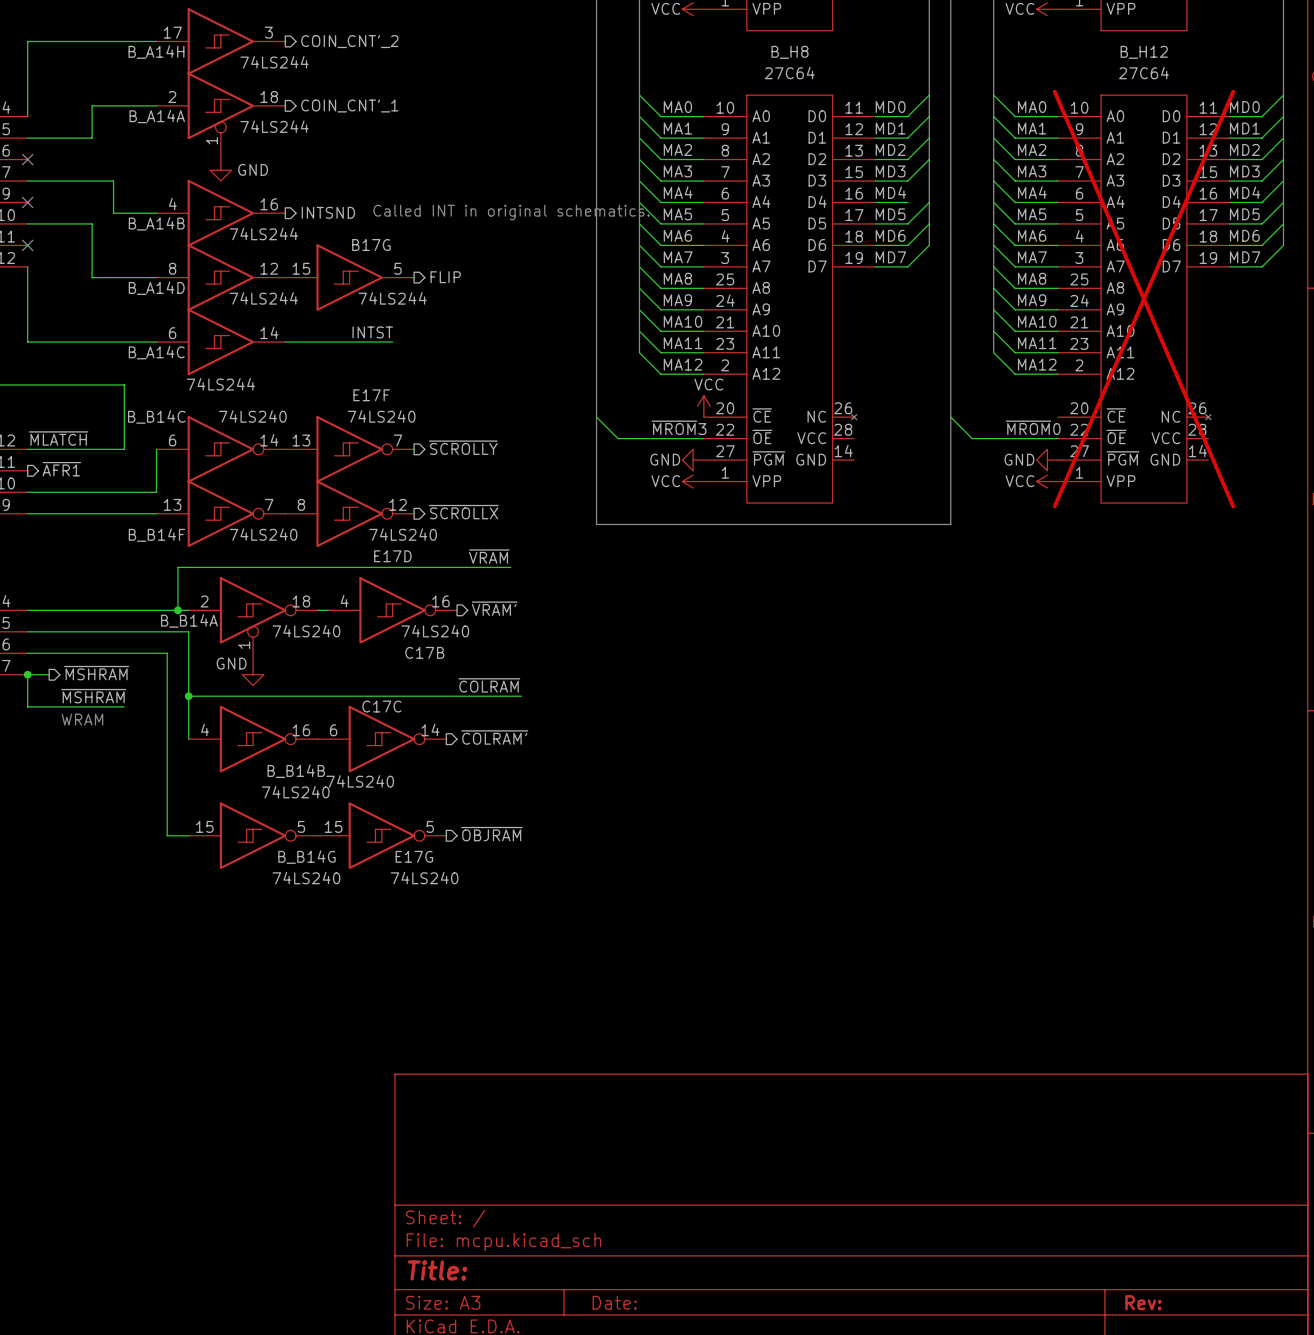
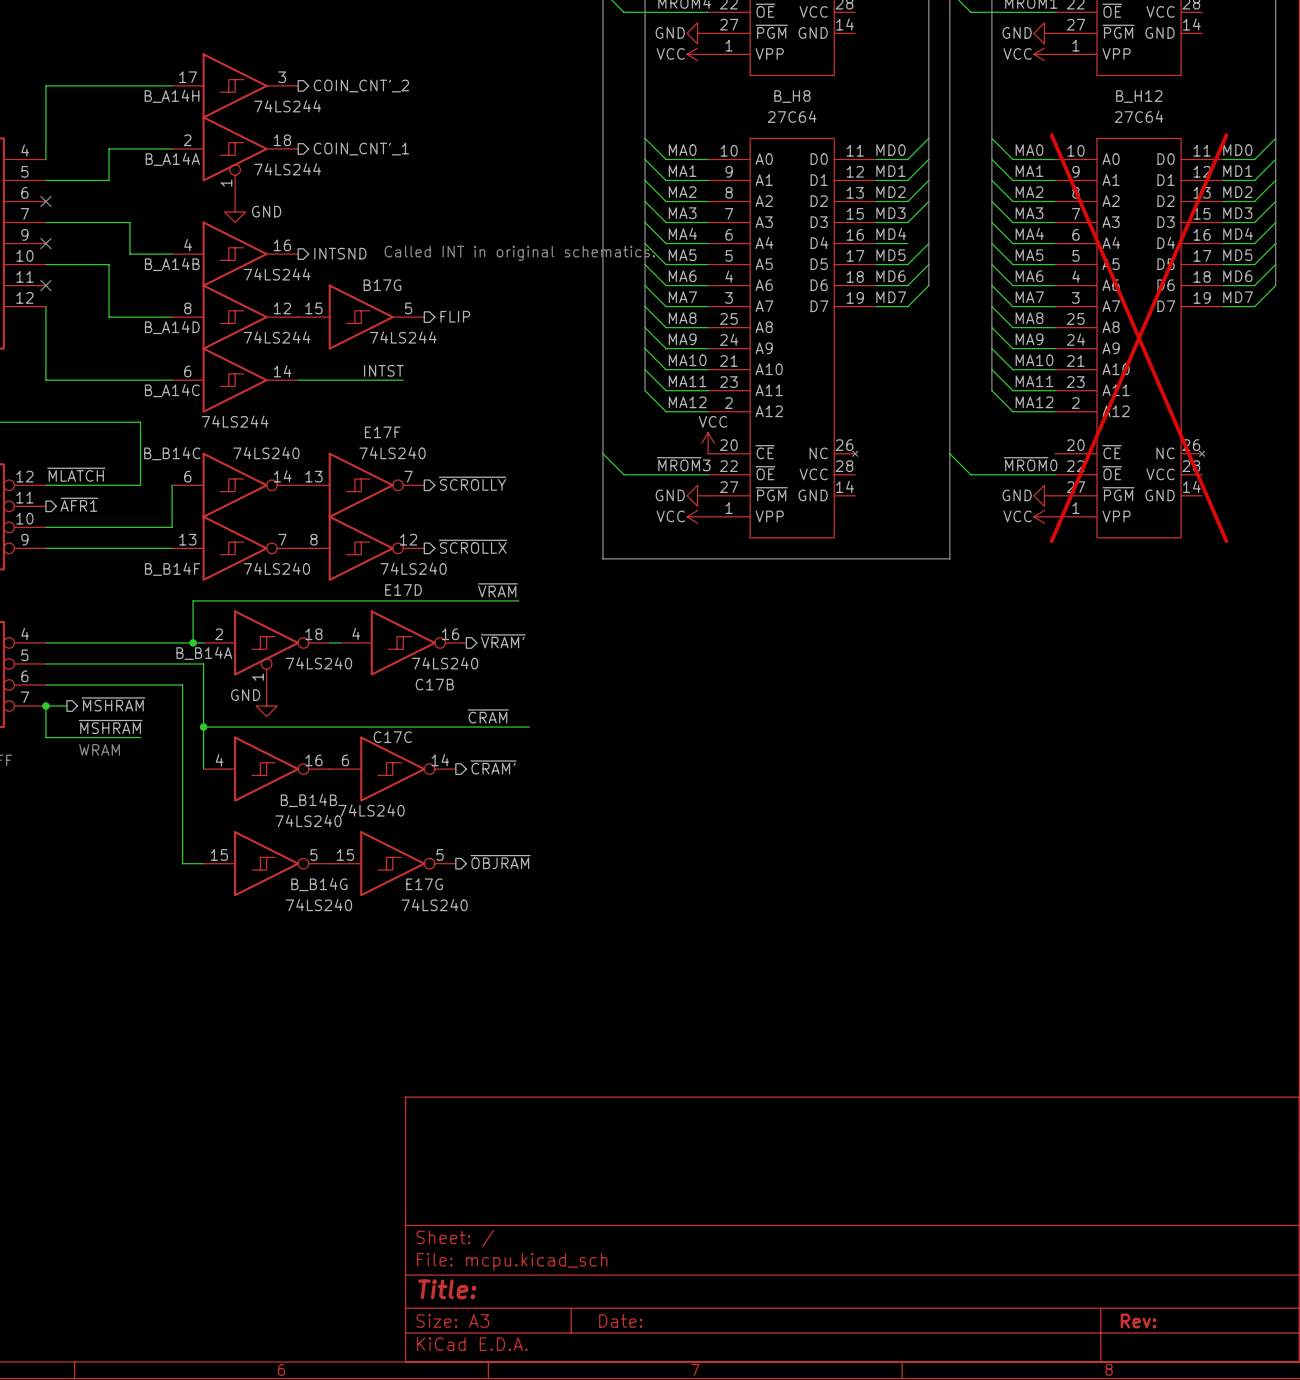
label: ~{COLRAM} (489, 685) -> ~{CRAM} (488, 716)
hierarchical label: ~{COLRAM'} (494, 737) -> ~{CRAM'} (493, 767)

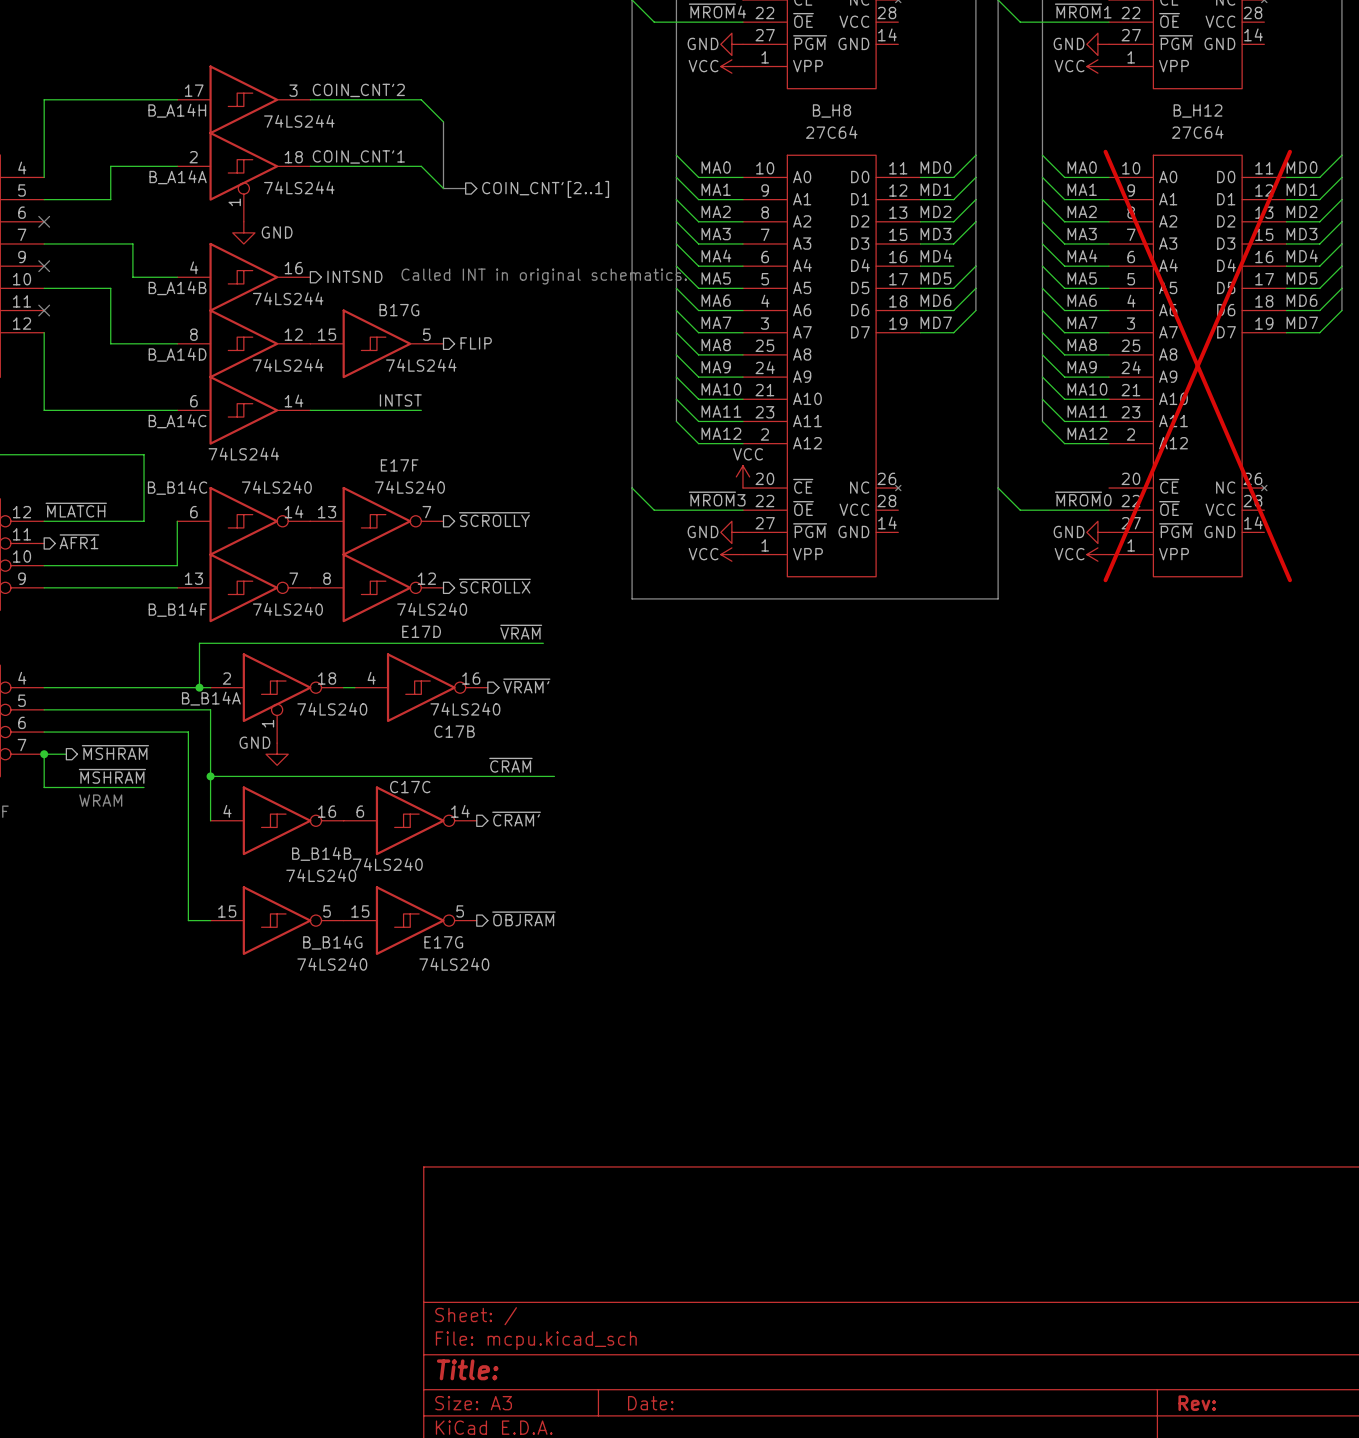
label: none -> COIN_CNT'2 (358, 90)
wire: none -> (310, 99) (421, 99) (443, 121)
hierarchical label: COIN_CNT'_2 (361, 86) -> none
bus: none -> (443, 121) (443, 188) (465, 188)
label: none -> COIN_CNT'1 (358, 156)
wire: none -> (310, 166) (421, 166) (443, 188)
hierarchical label: COIN_CNT'_1 (361, 149) -> none
hierarchical label: none -> COIN_CNT'[2..1] (545, 189)

